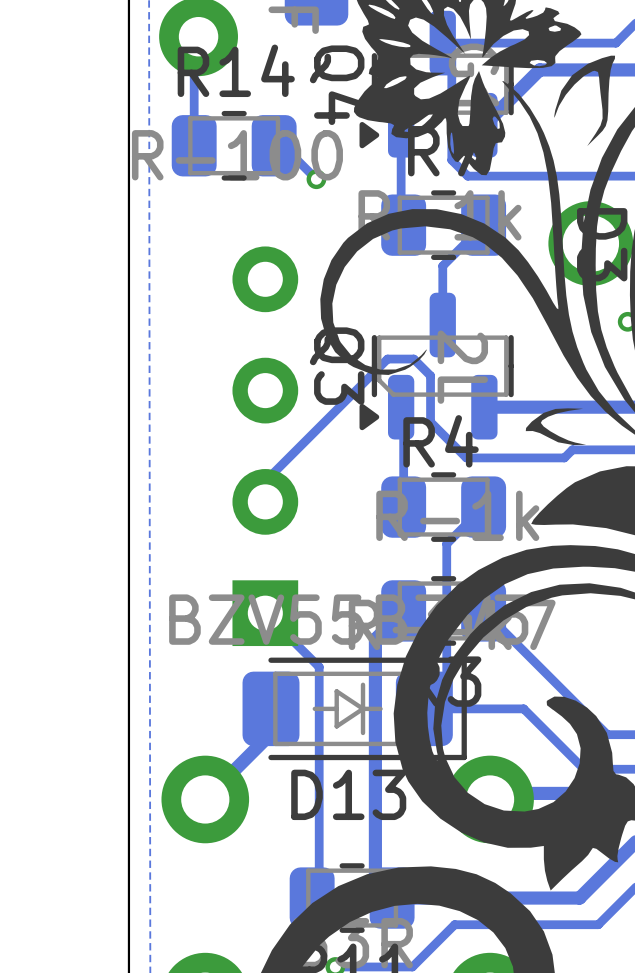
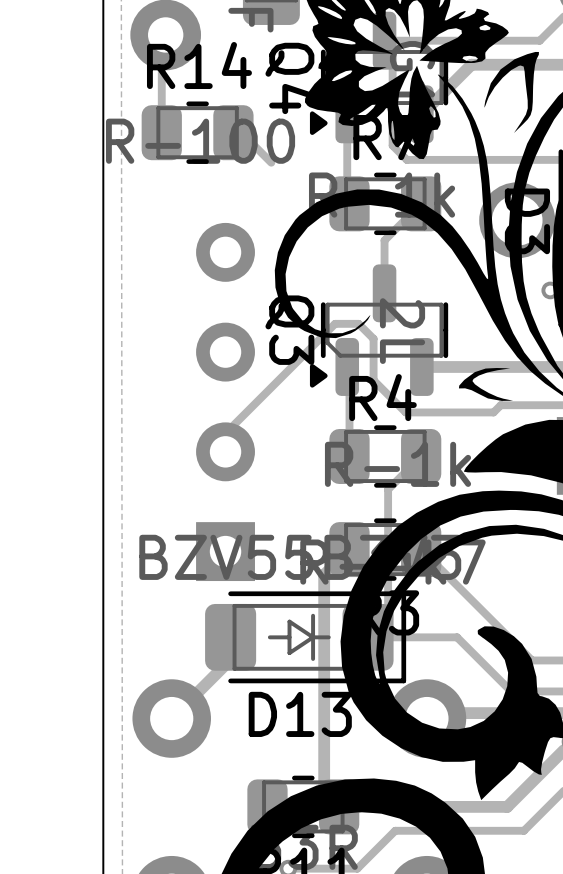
via: (316, 179) -> none
track: (265, 613) (319, 667) (319, 891) (312, 898) -> none

